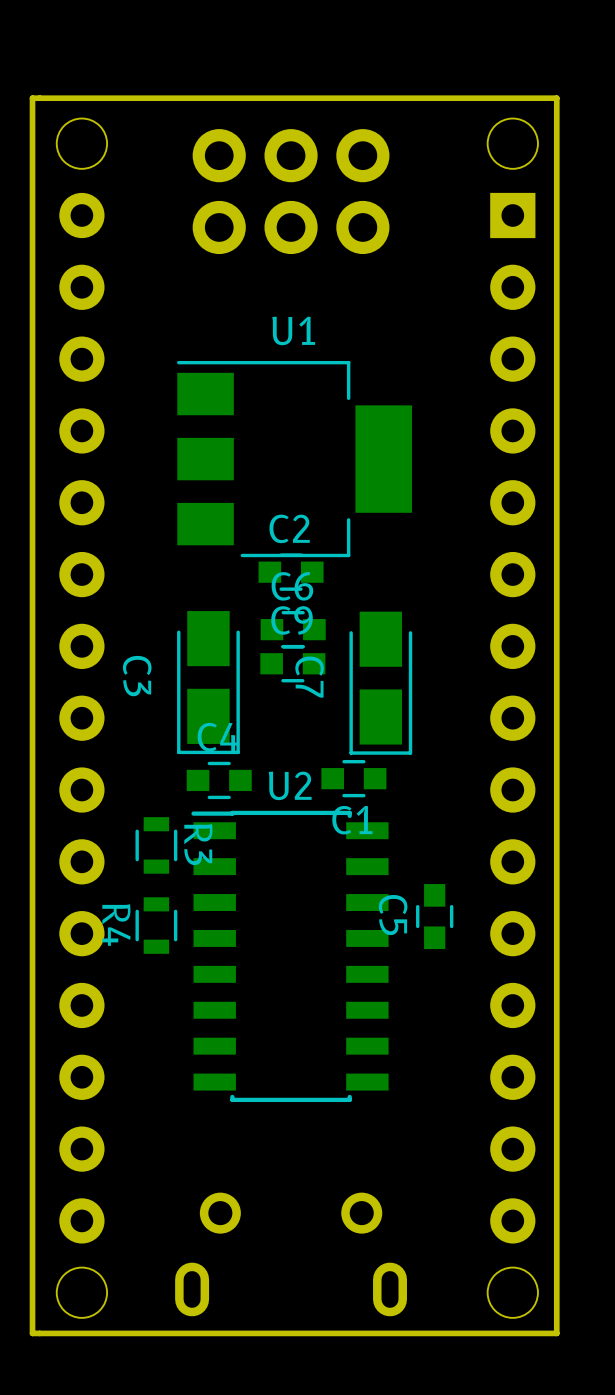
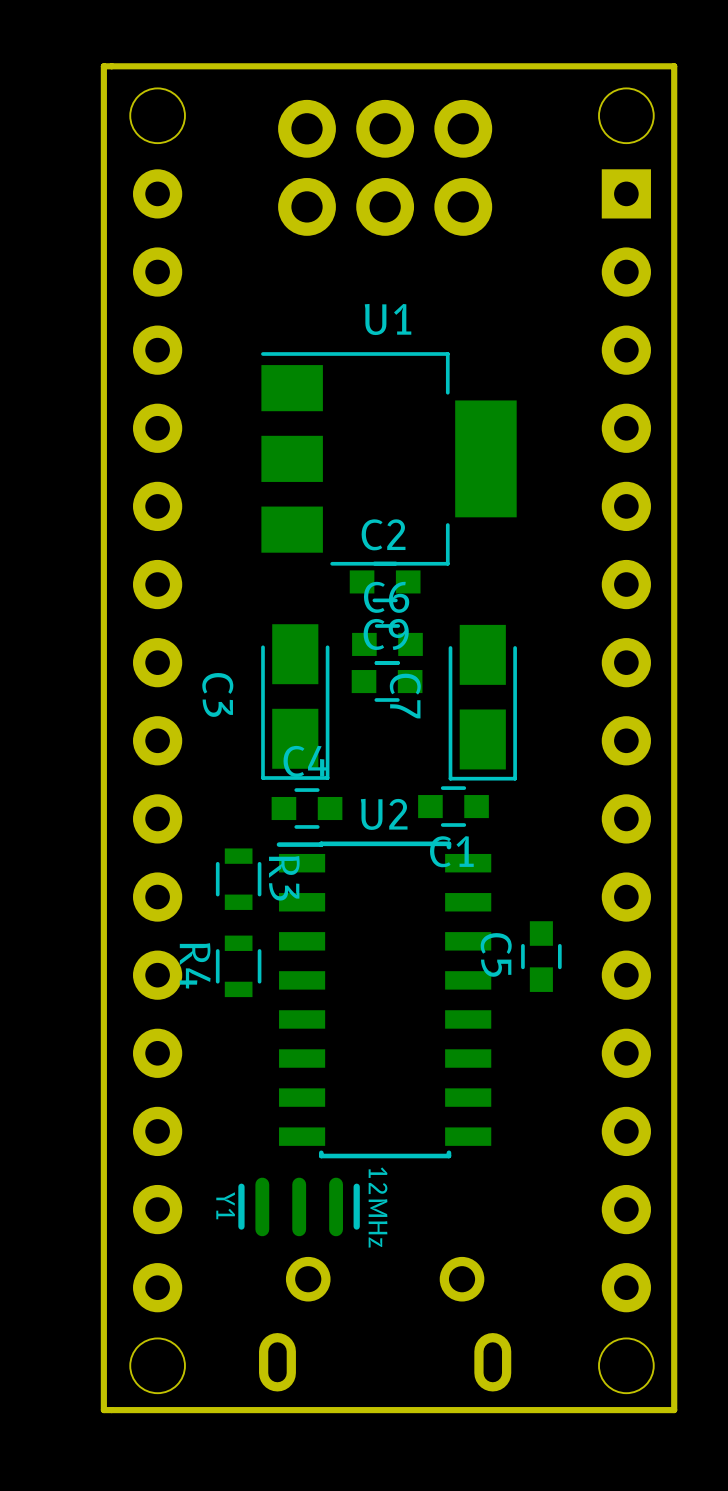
Y1: none -> 12MHz (299, 1206)

